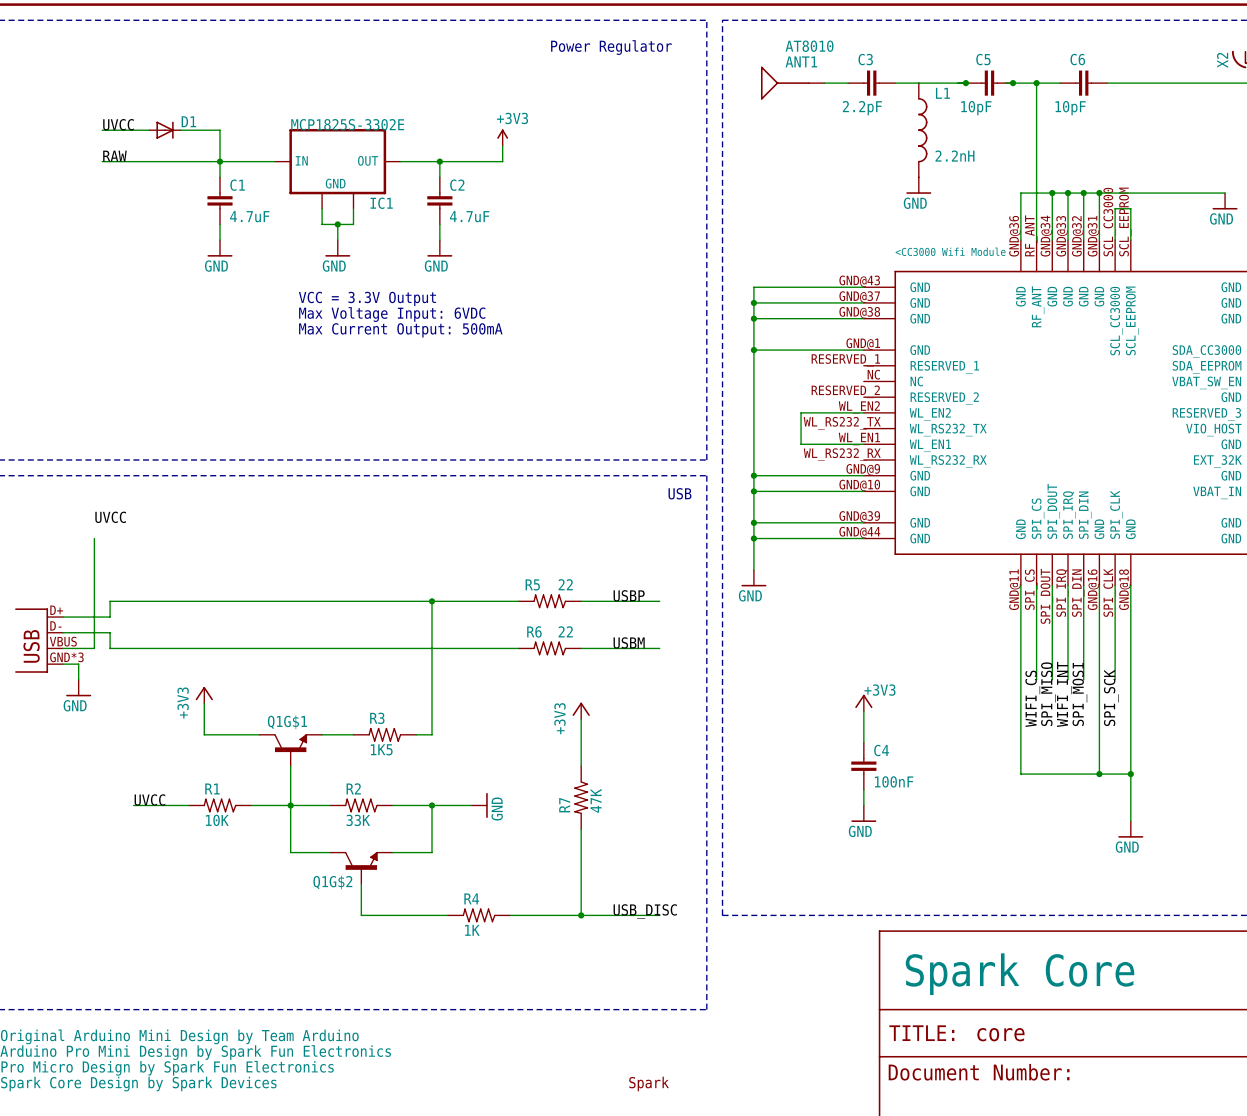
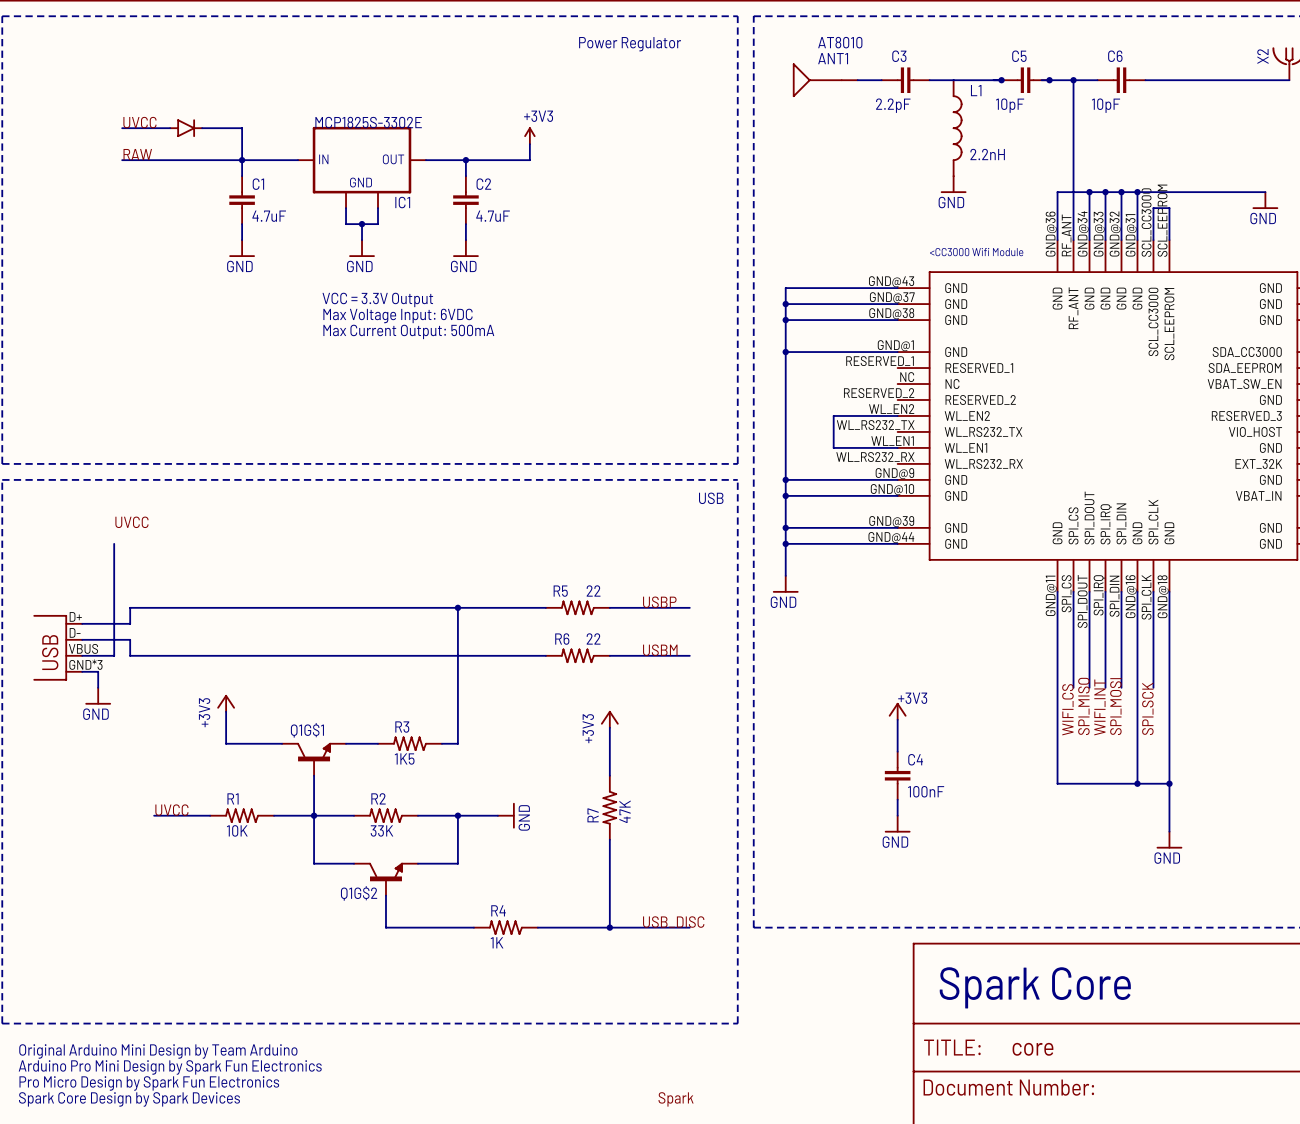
D1: (165, 130) -> none
part: none -> (186, 128)

